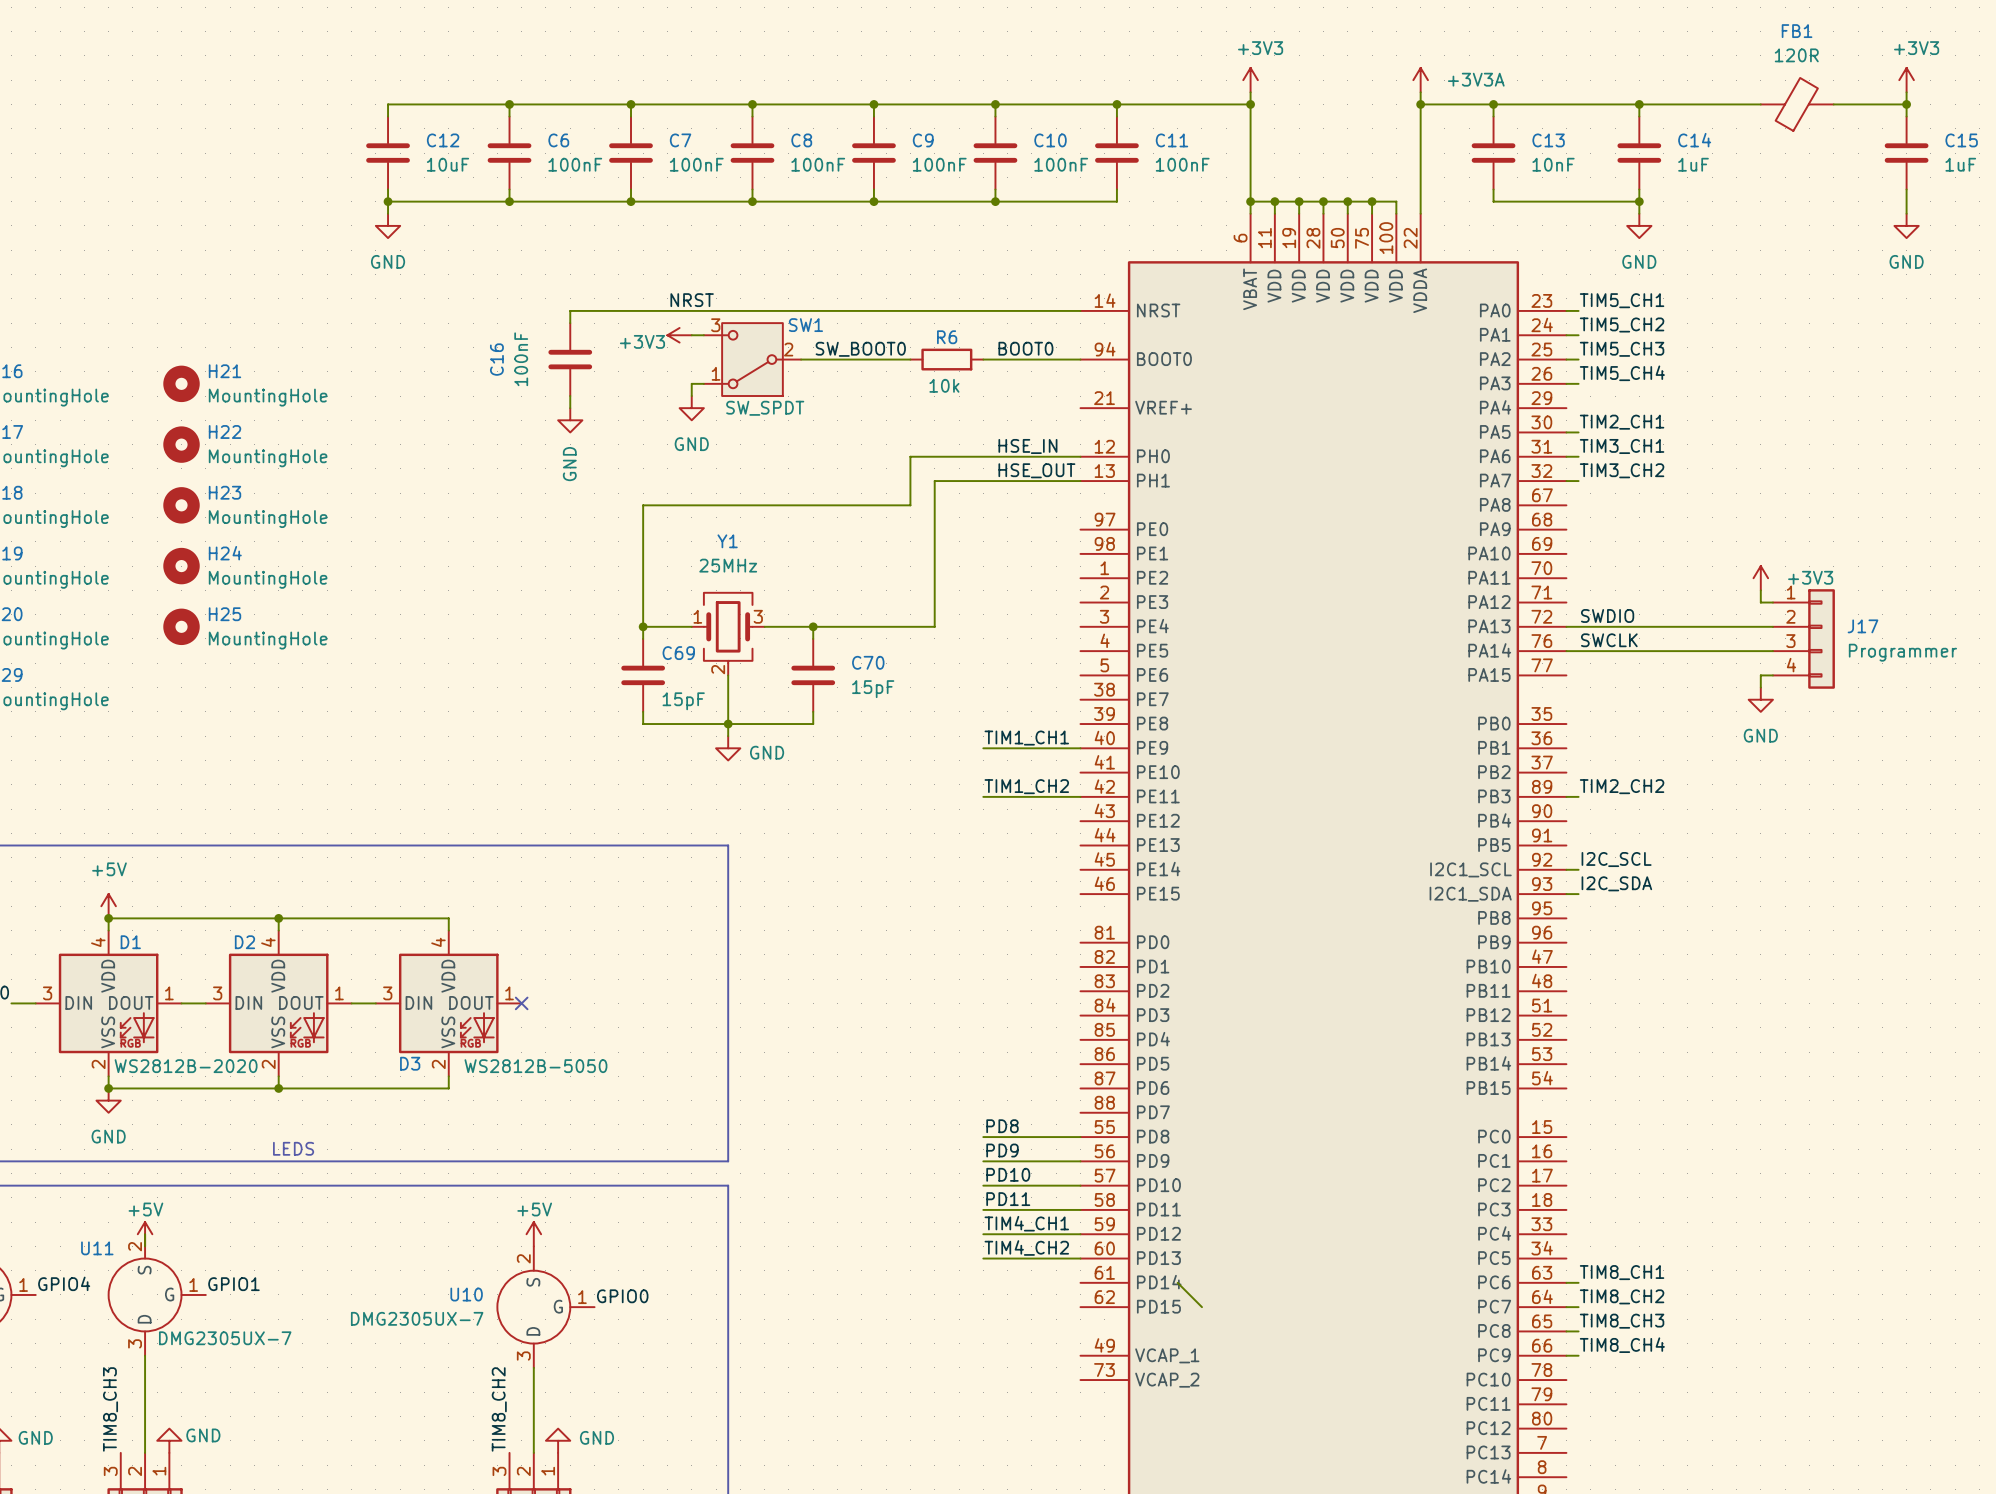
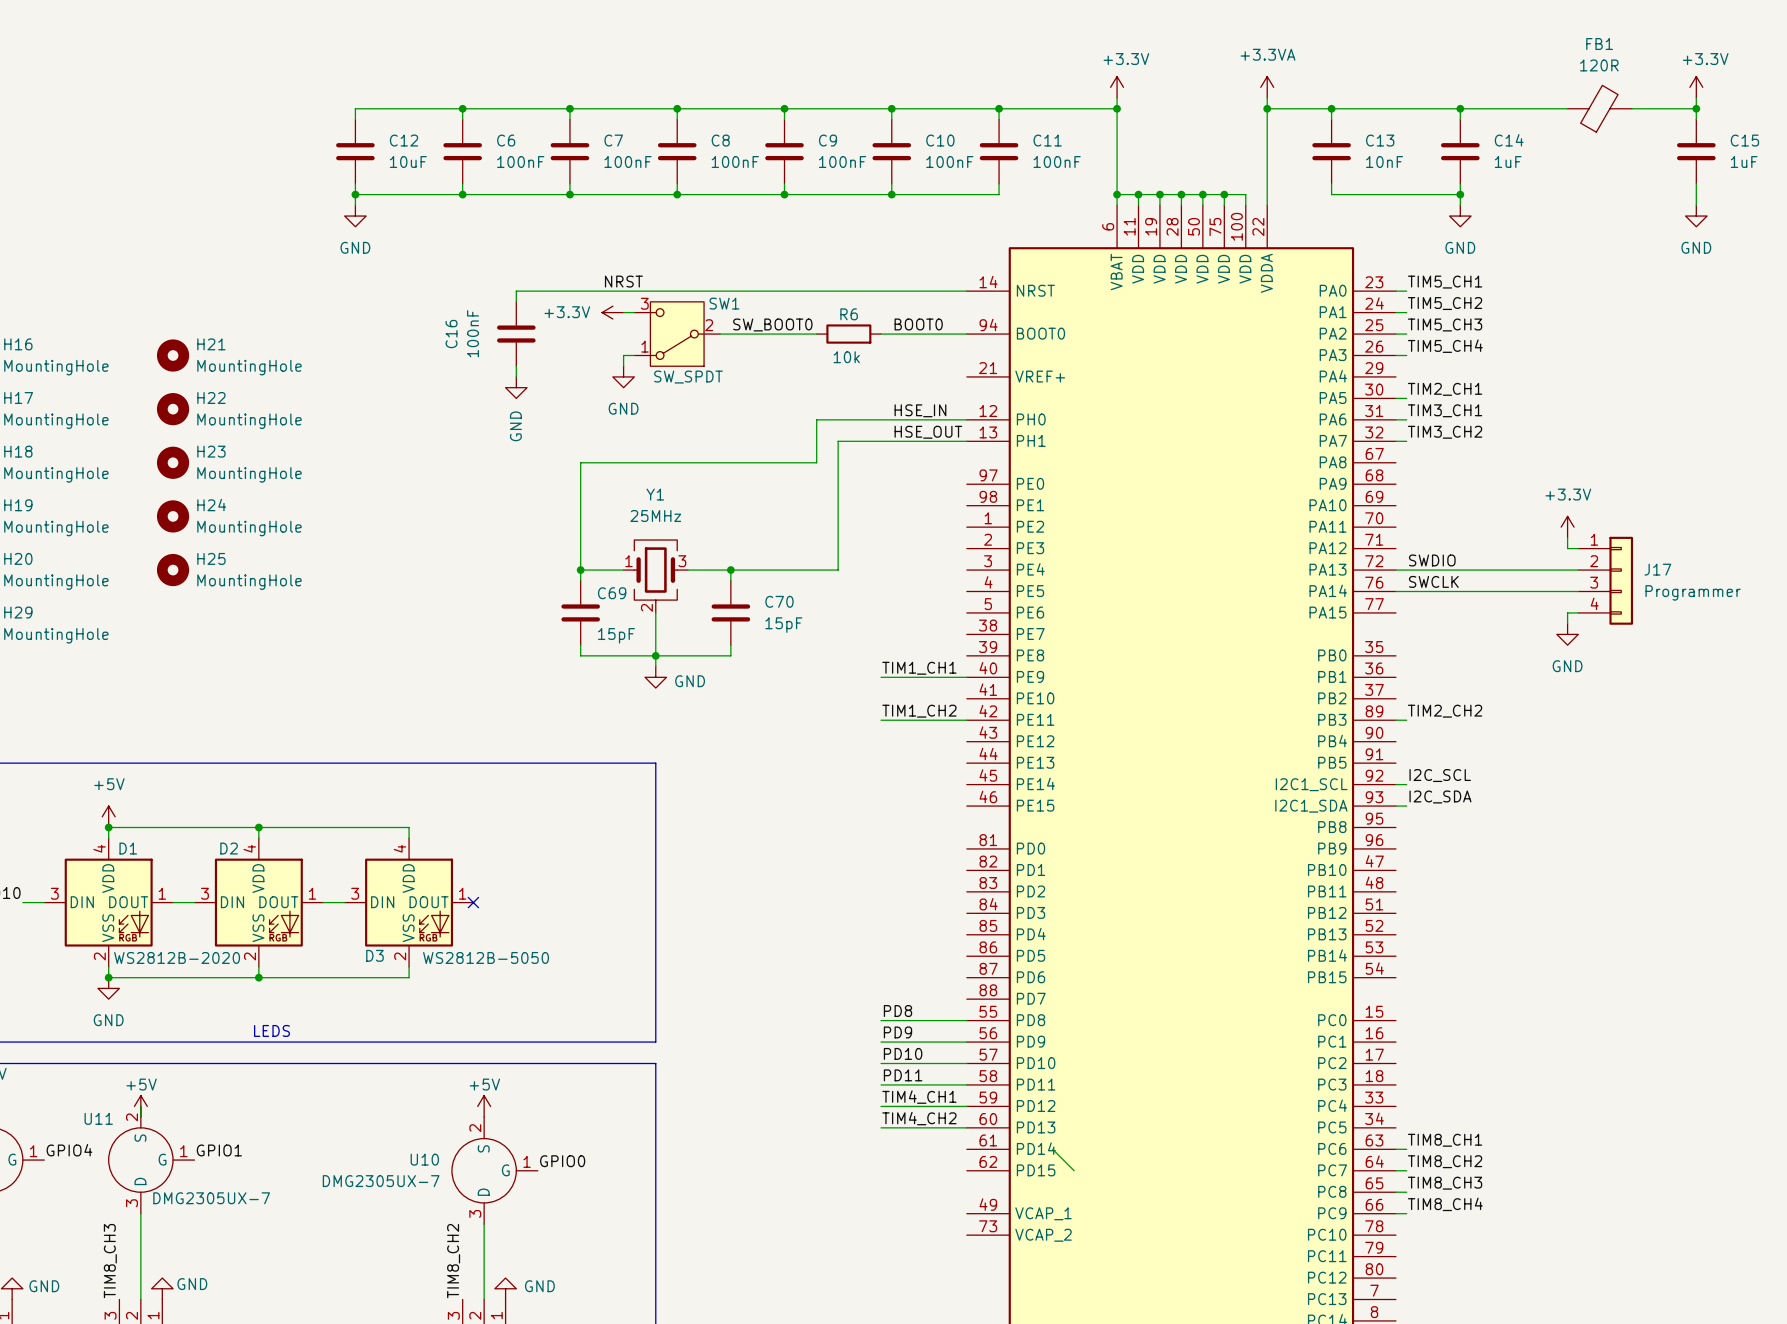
power symbol: +3V3 (1250, 80) -> +3.3V (1117, 87)
power symbol: +3V3A (1420, 80) -> +3.3VA (1267, 87)
power symbol: +3V3 (1906, 80) -> +3.3V (1696, 87)
power symbol: +3V3 (679, 335) -> +3.3V (612, 312)
power symbol: +3V3 (1760, 578) -> +3.3V (1567, 527)

